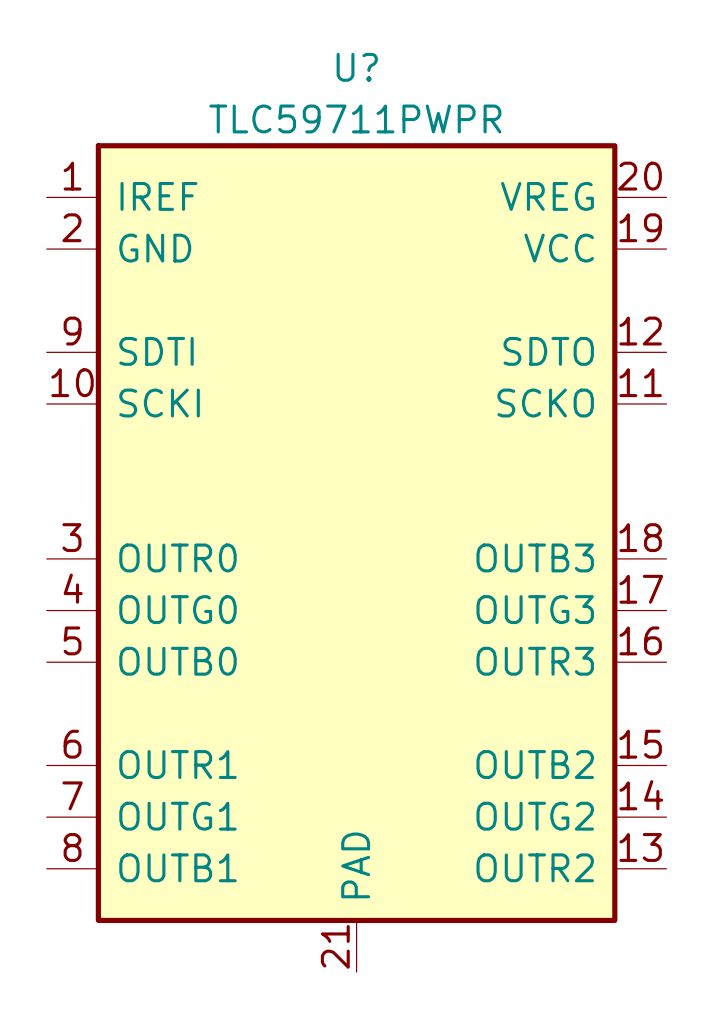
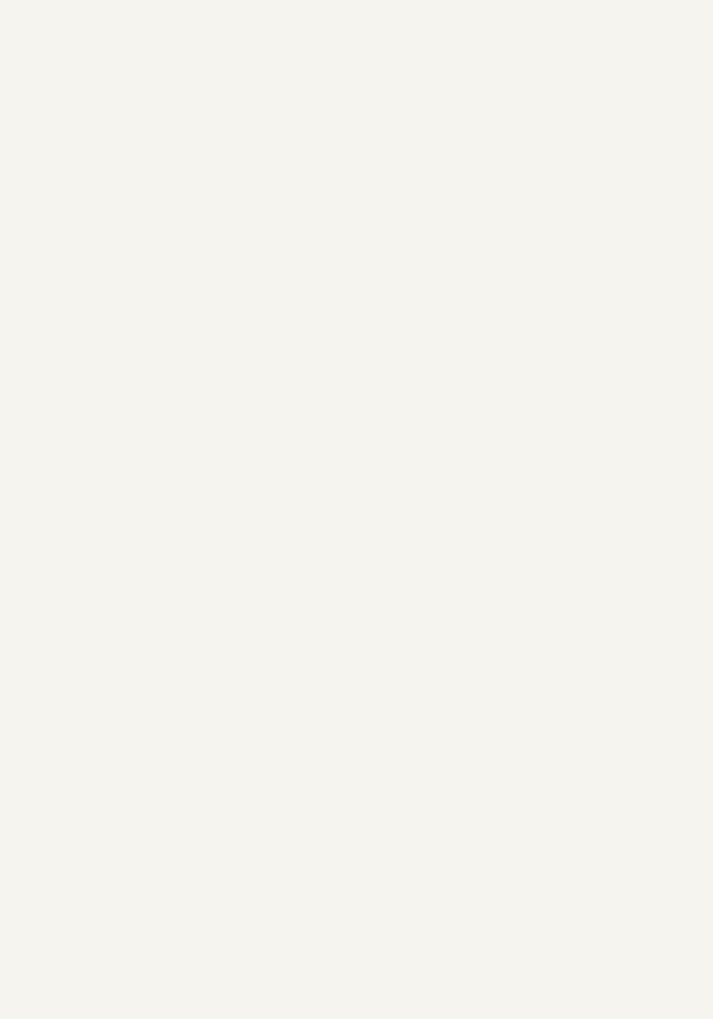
U?: TLC59711PWPR (356, 557) -> none

